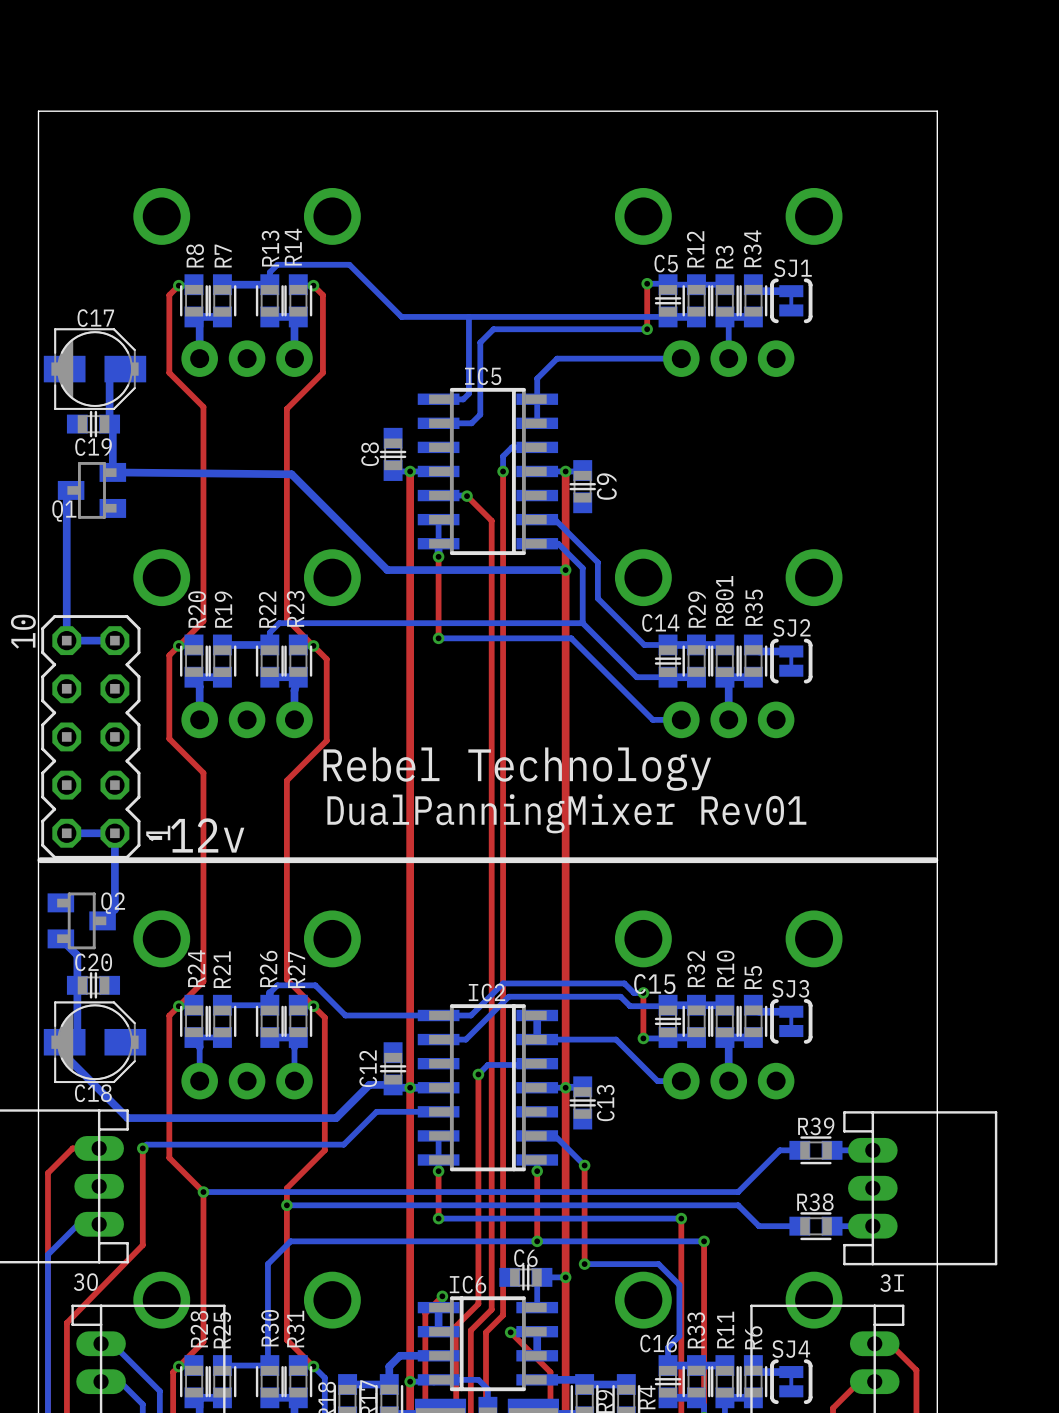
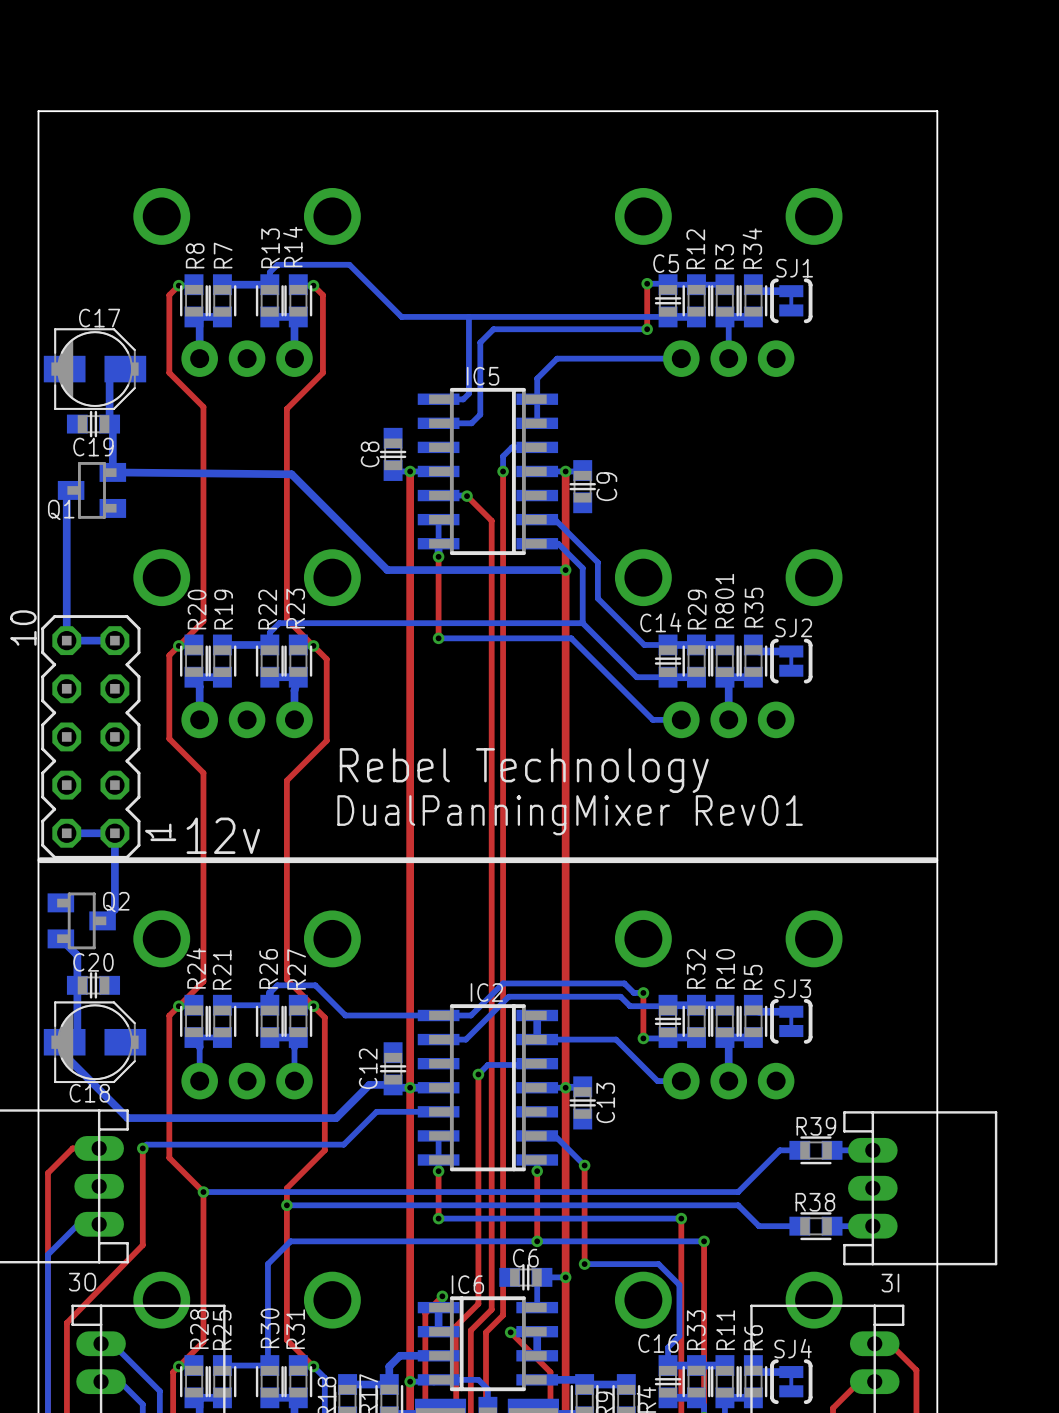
C15 name: C15 (654, 984) -> none

